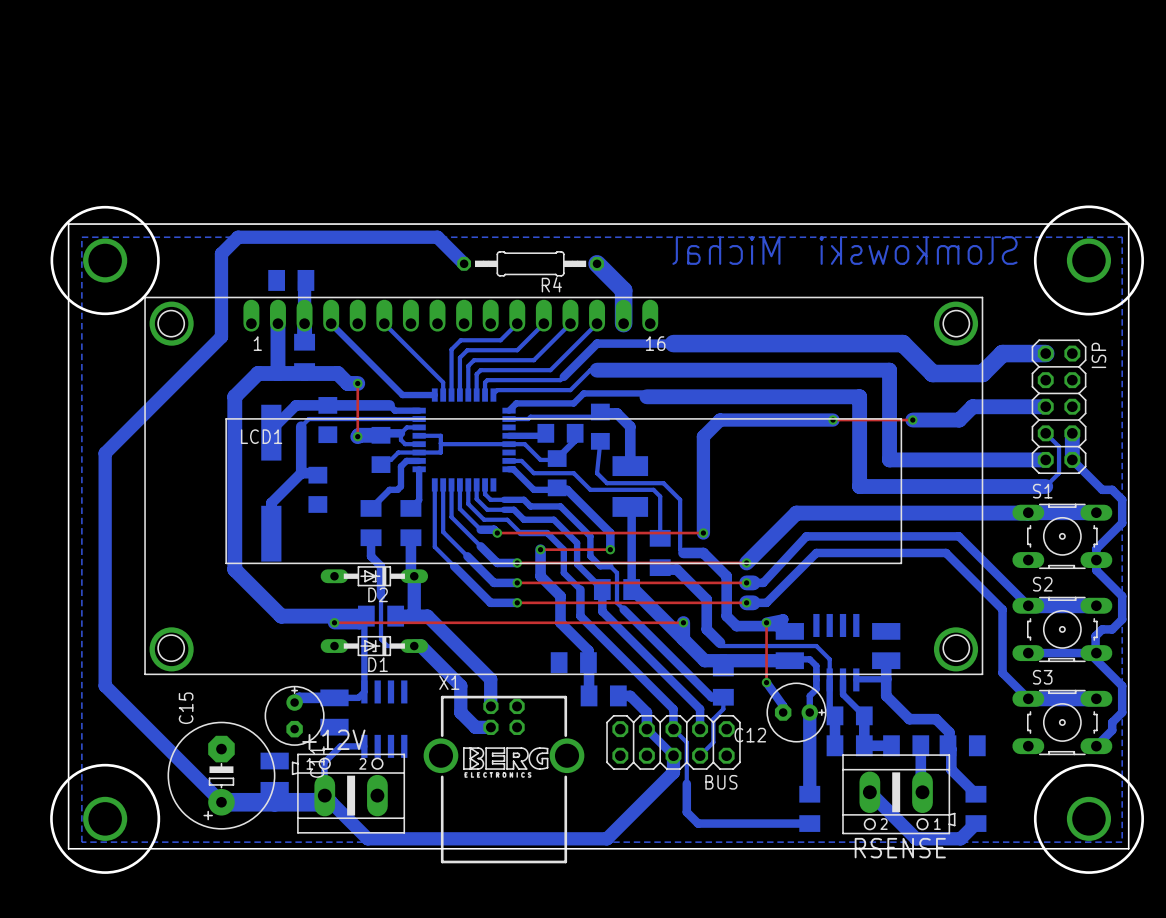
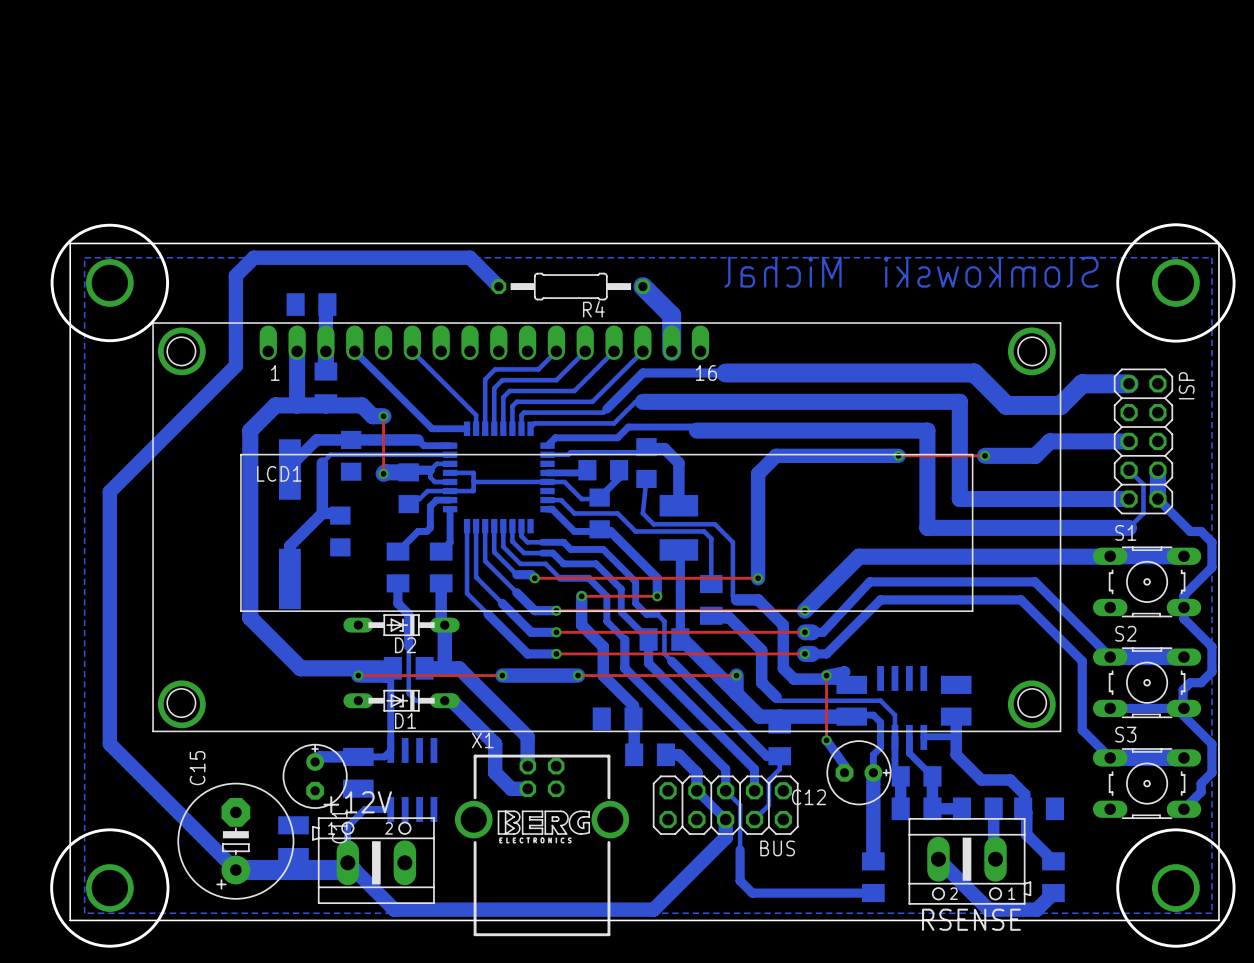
bottom track: none -> (502, 675) (578, 675)
top track: (467, 622) (537, 622) -> none
via: none -> (502, 675)
via: none -> (578, 675)

